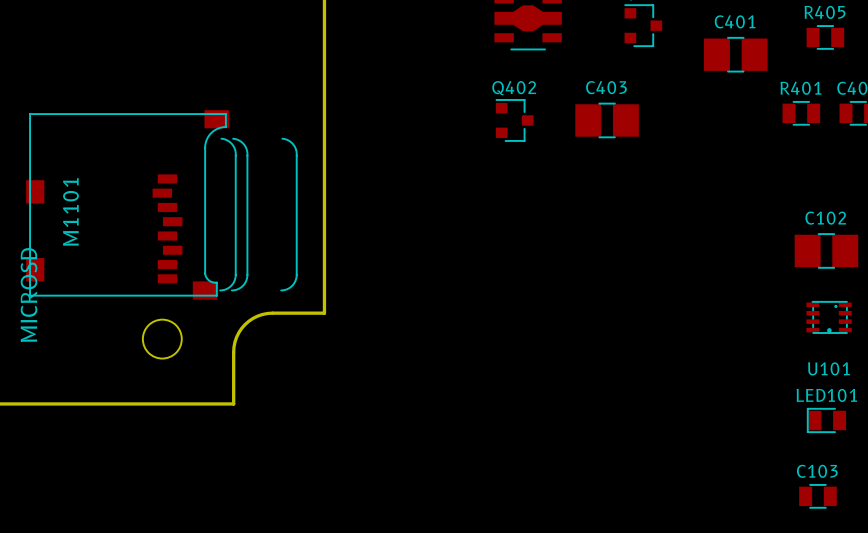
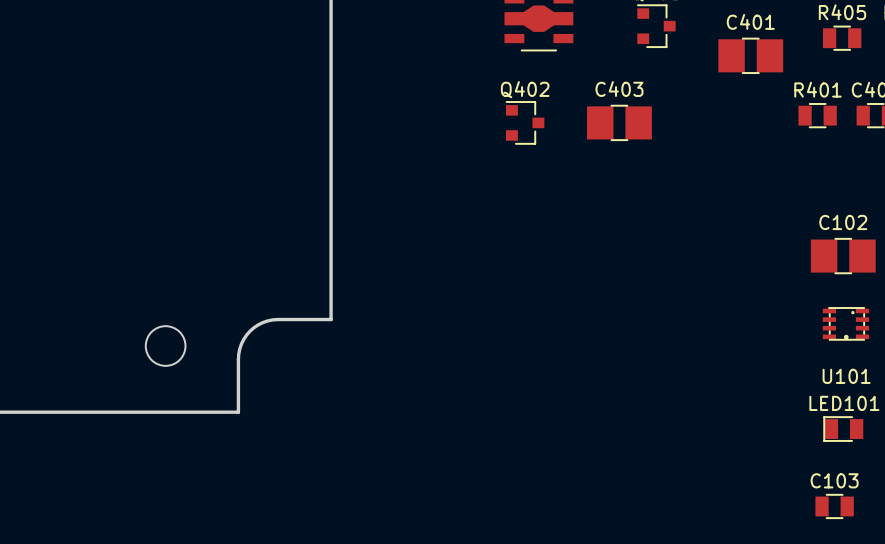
M1101: MICROSD (161, 204) -> none

